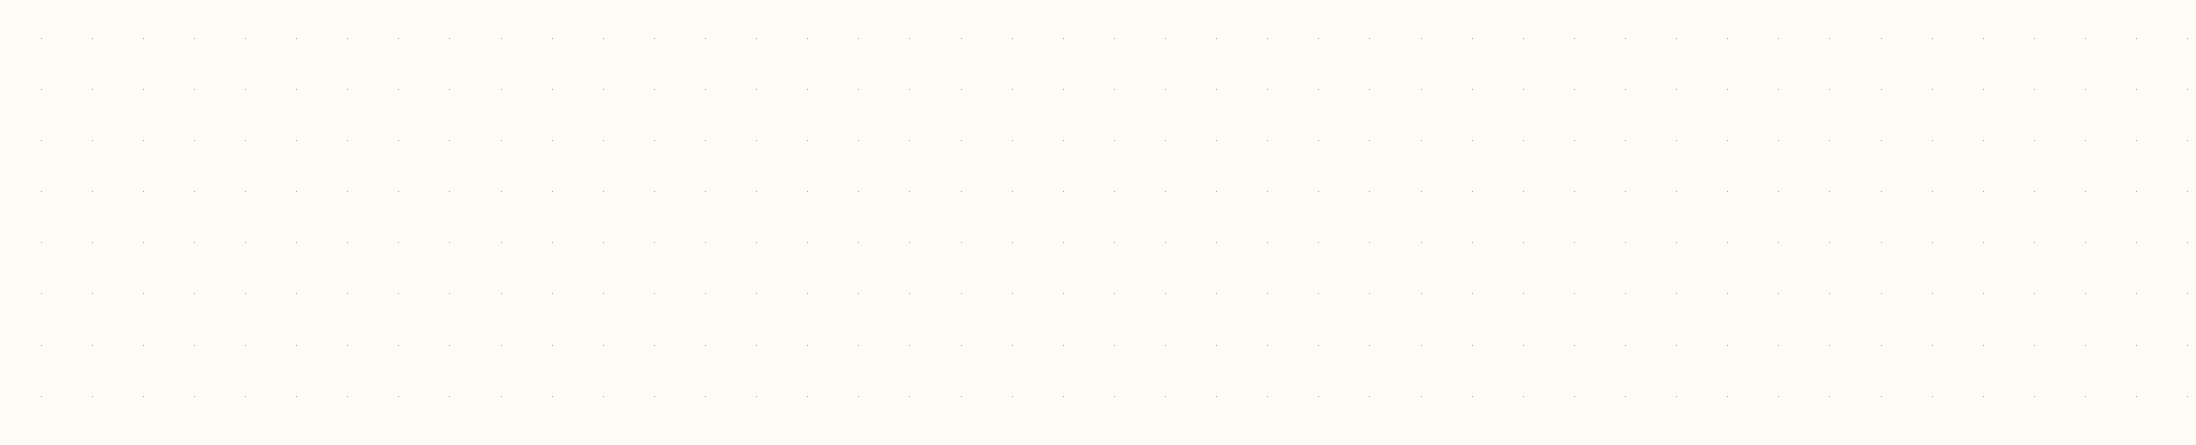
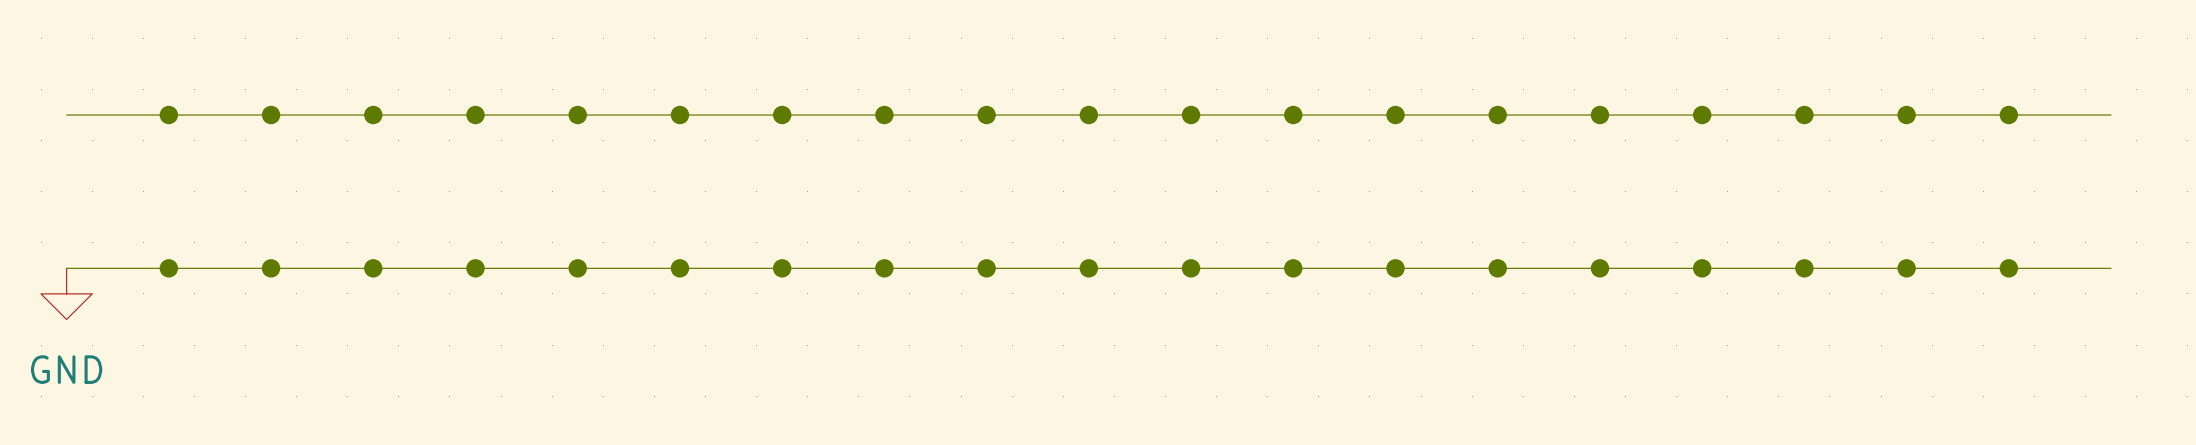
wire: none -> (66, 115) (2111, 115)
junction: none -> (168, 115)
junction: none -> (271, 115)
junction: none -> (373, 115)
junction: none -> (475, 115)
junction: none -> (577, 115)
junction: none -> (679, 115)
junction: none -> (782, 115)
junction: none -> (884, 115)
junction: none -> (986, 115)
junction: none -> (1088, 115)
junction: none -> (1191, 115)
junction: none -> (1293, 115)
junction: none -> (1395, 115)
junction: none -> (1497, 115)
junction: none -> (1599, 115)
junction: none -> (1702, 115)
junction: none -> (1804, 115)
junction: none -> (1906, 115)
junction: none -> (2008, 115)
wire: none -> (66, 268) (2111, 268)
junction: none -> (168, 268)
junction: none -> (271, 268)
junction: none -> (373, 268)
junction: none -> (475, 268)
junction: none -> (577, 268)
junction: none -> (679, 268)
junction: none -> (782, 268)
junction: none -> (884, 268)
junction: none -> (986, 268)
junction: none -> (1088, 268)
junction: none -> (1191, 268)
junction: none -> (1293, 268)
junction: none -> (1395, 268)
junction: none -> (1497, 268)
junction: none -> (1599, 268)
junction: none -> (1702, 268)
junction: none -> (1804, 268)
junction: none -> (1906, 268)
junction: none -> (2008, 268)
power symbol: none -> GND (66, 293)

